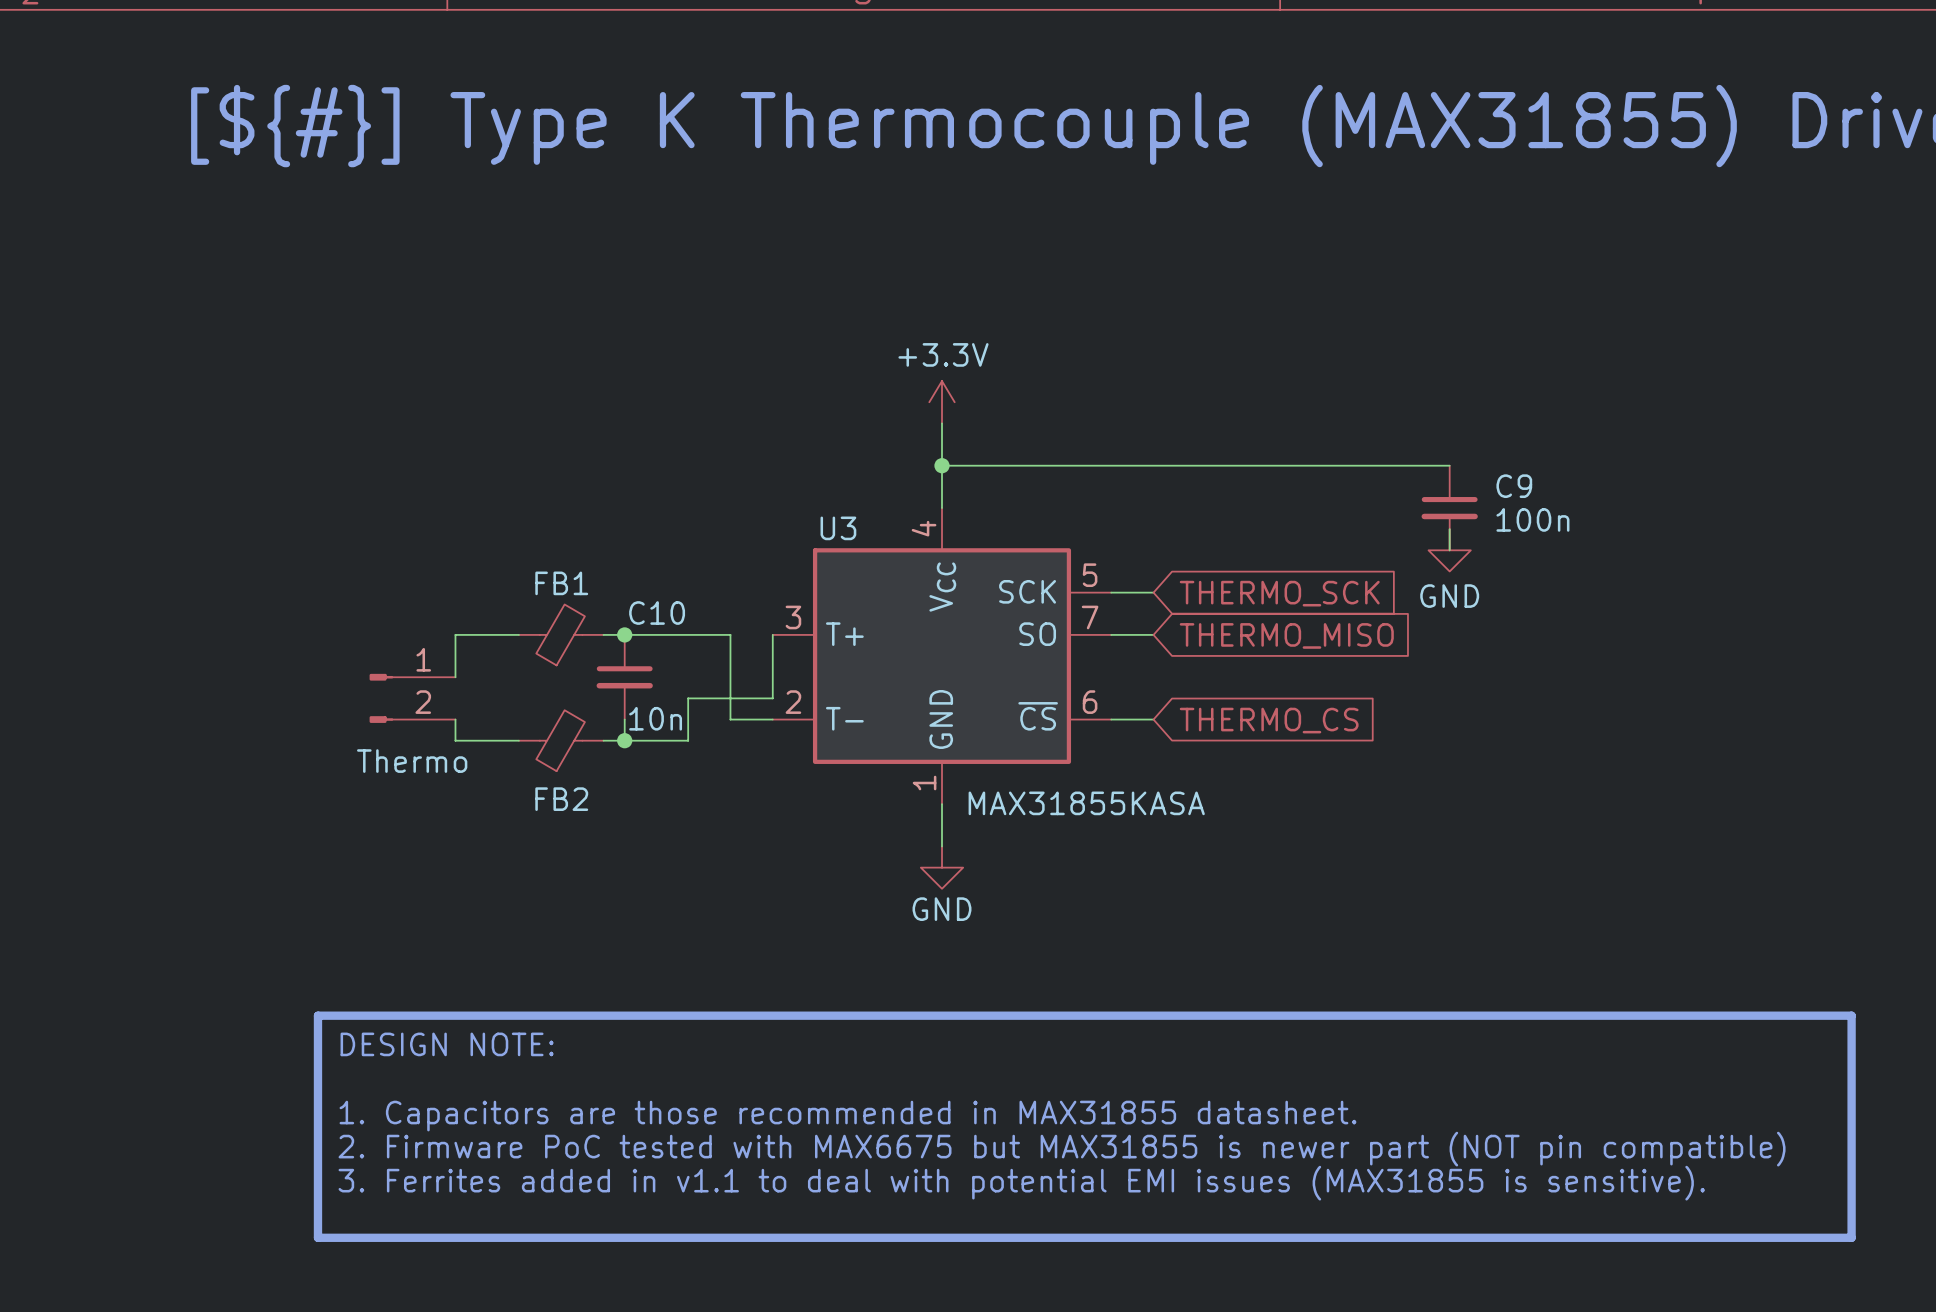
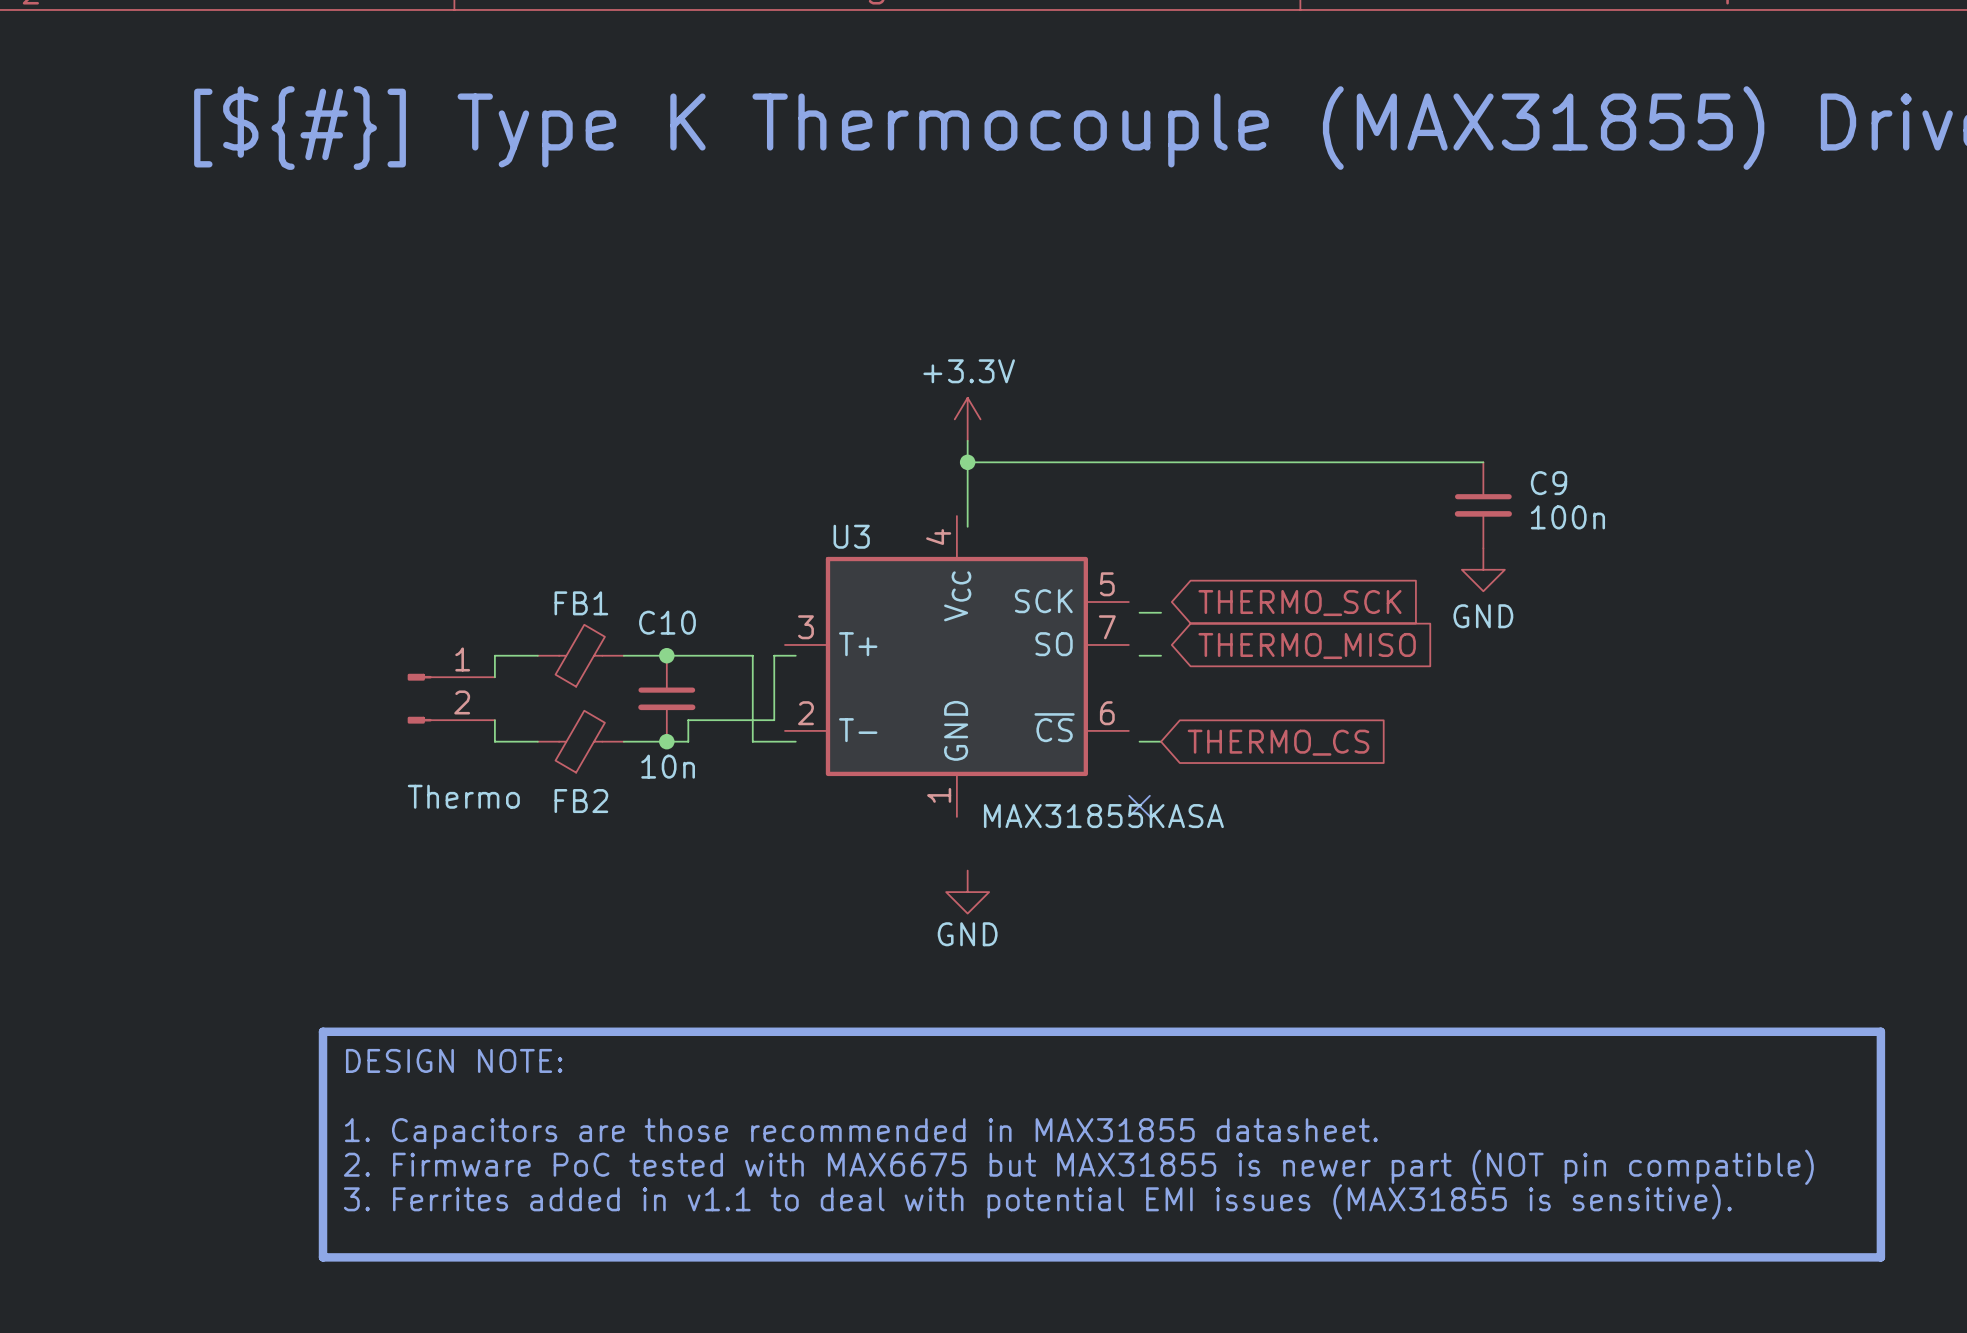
power symbol position: +3.3V (942, 402) -> +3.3V (967, 419)
wire: (942, 423) (942, 508) -> (967, 440) (967, 526)
wire: (942, 465) (1449, 465) -> (967, 462) (1483, 462)
junction position: (942, 465) -> (967, 462)
C9 position: (1449, 508) -> (1483, 505)
wire: (1449, 529) (1449, 550) -> none
power symbol position: GND (1449, 550) -> GND (1483, 569)
wire: (1111, 592) (1153, 592) -> none
wire: none -> (1139, 612) (1161, 612)
wire: (518, 634) (455, 634) (455, 677) -> none
FB1 position: (561, 634) -> (580, 655)
wire: (603, 634) (730, 634) (730, 719) (772, 719) -> (623, 655) (752, 655) (752, 741) (795, 741)
junction position: (624, 634) -> (666, 655)
wire: (772, 634) (772, 698) (688, 698) (688, 740) (603, 740) -> none
wire: (1111, 634) (1153, 634) -> none
wire: none -> (537, 655) (494, 655) (494, 677)
wire: none -> (795, 655) (774, 655) (774, 720) (688, 720) (688, 741) (623, 741)
wire: none -> (1139, 655) (1161, 655)
C10 position: (624, 677) -> (666, 698)
part position: (412, 698) -> (451, 698)
wire: none -> (494, 720) (494, 741) (537, 741)
C10 value position: 10n (655, 718) -> 10n (668, 766)
wire: (455, 719) (455, 740) (518, 740) -> none
wire: (624, 719) (624, 740) -> none
wire: (1111, 719) (1153, 719) -> none
global label position: THERMO_CS (1269, 720) -> THERMO_CS (1278, 742)
wire: none -> (1139, 741) (1161, 741)
FB2 position: (561, 740) -> (580, 741)
junction position: (624, 740) -> (666, 741)
part value position: Thermo (412, 761) -> Thermo (463, 796)
no-connect mark: none -> (1139, 806)
wire: (942, 804) (942, 846) -> none
power symbol position: GND (942, 867) -> GND (967, 892)

